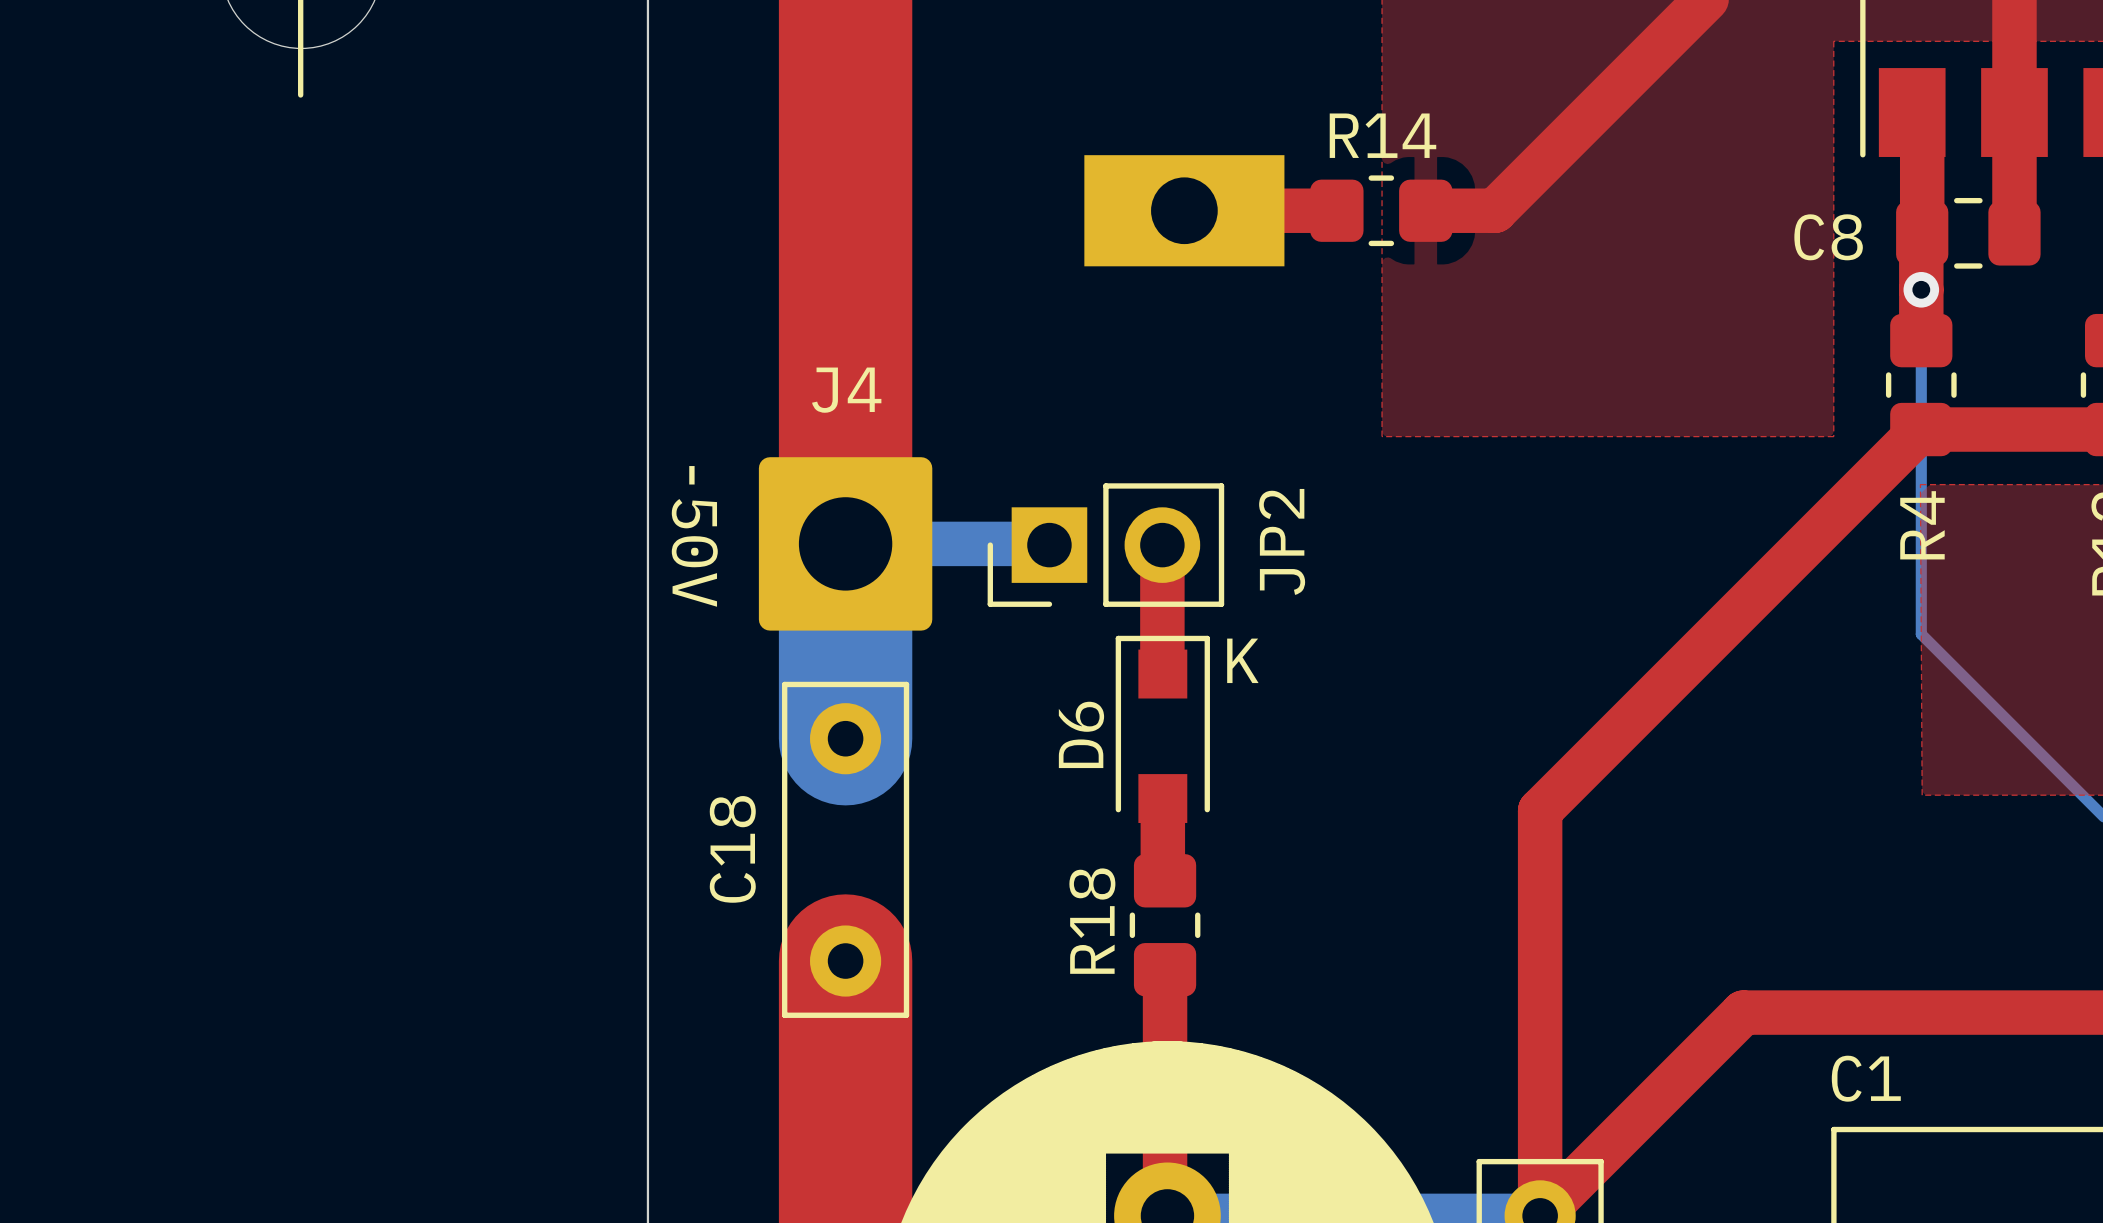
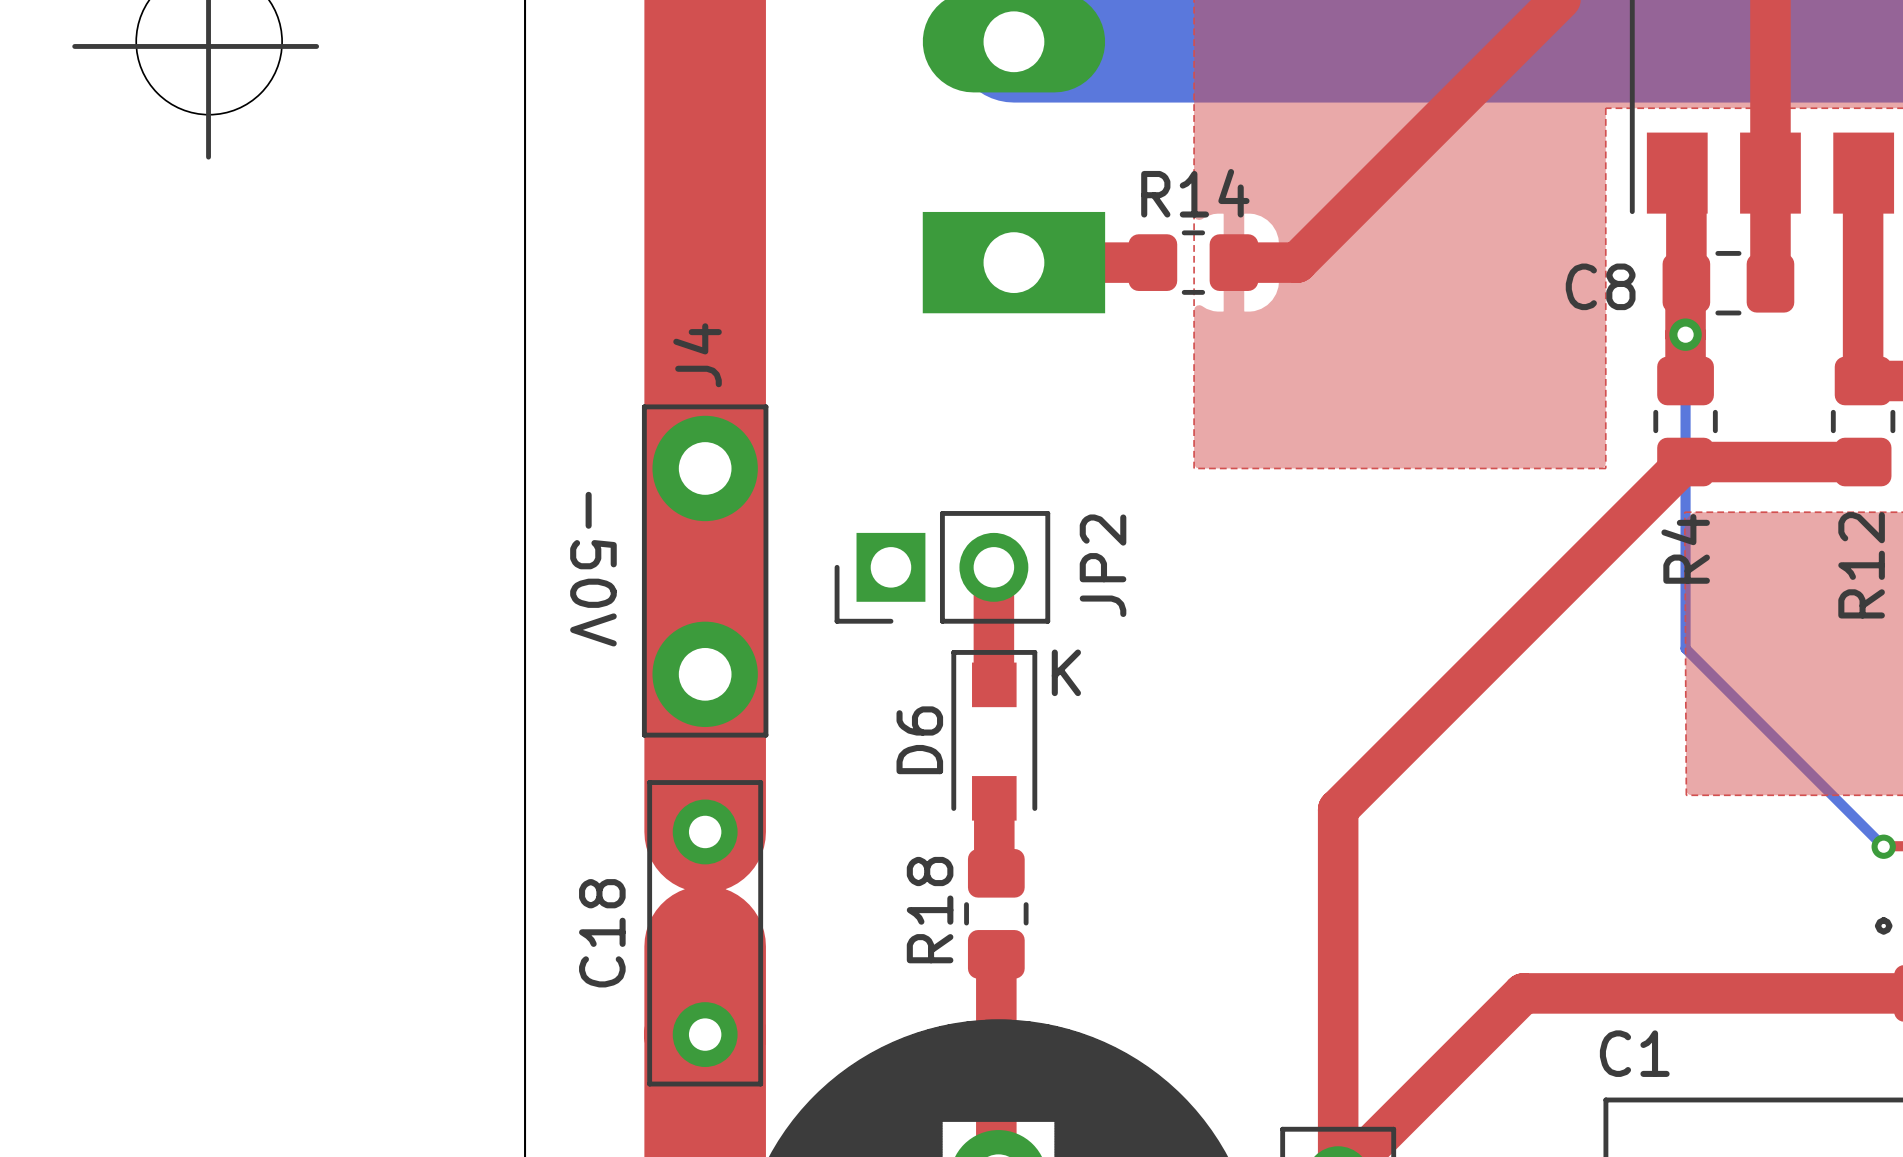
J4 footprint: [758, 457, 933, 631] -> [641, 404, 769, 738]
text position: -50V (694, 536) -> -50V (593, 569)
top track: none -> (705, 566) (705, 831)
bottom track: (1048, 543) (845, 543) (845, 738) -> none
C18 position: (845, 849) -> (705, 933)

